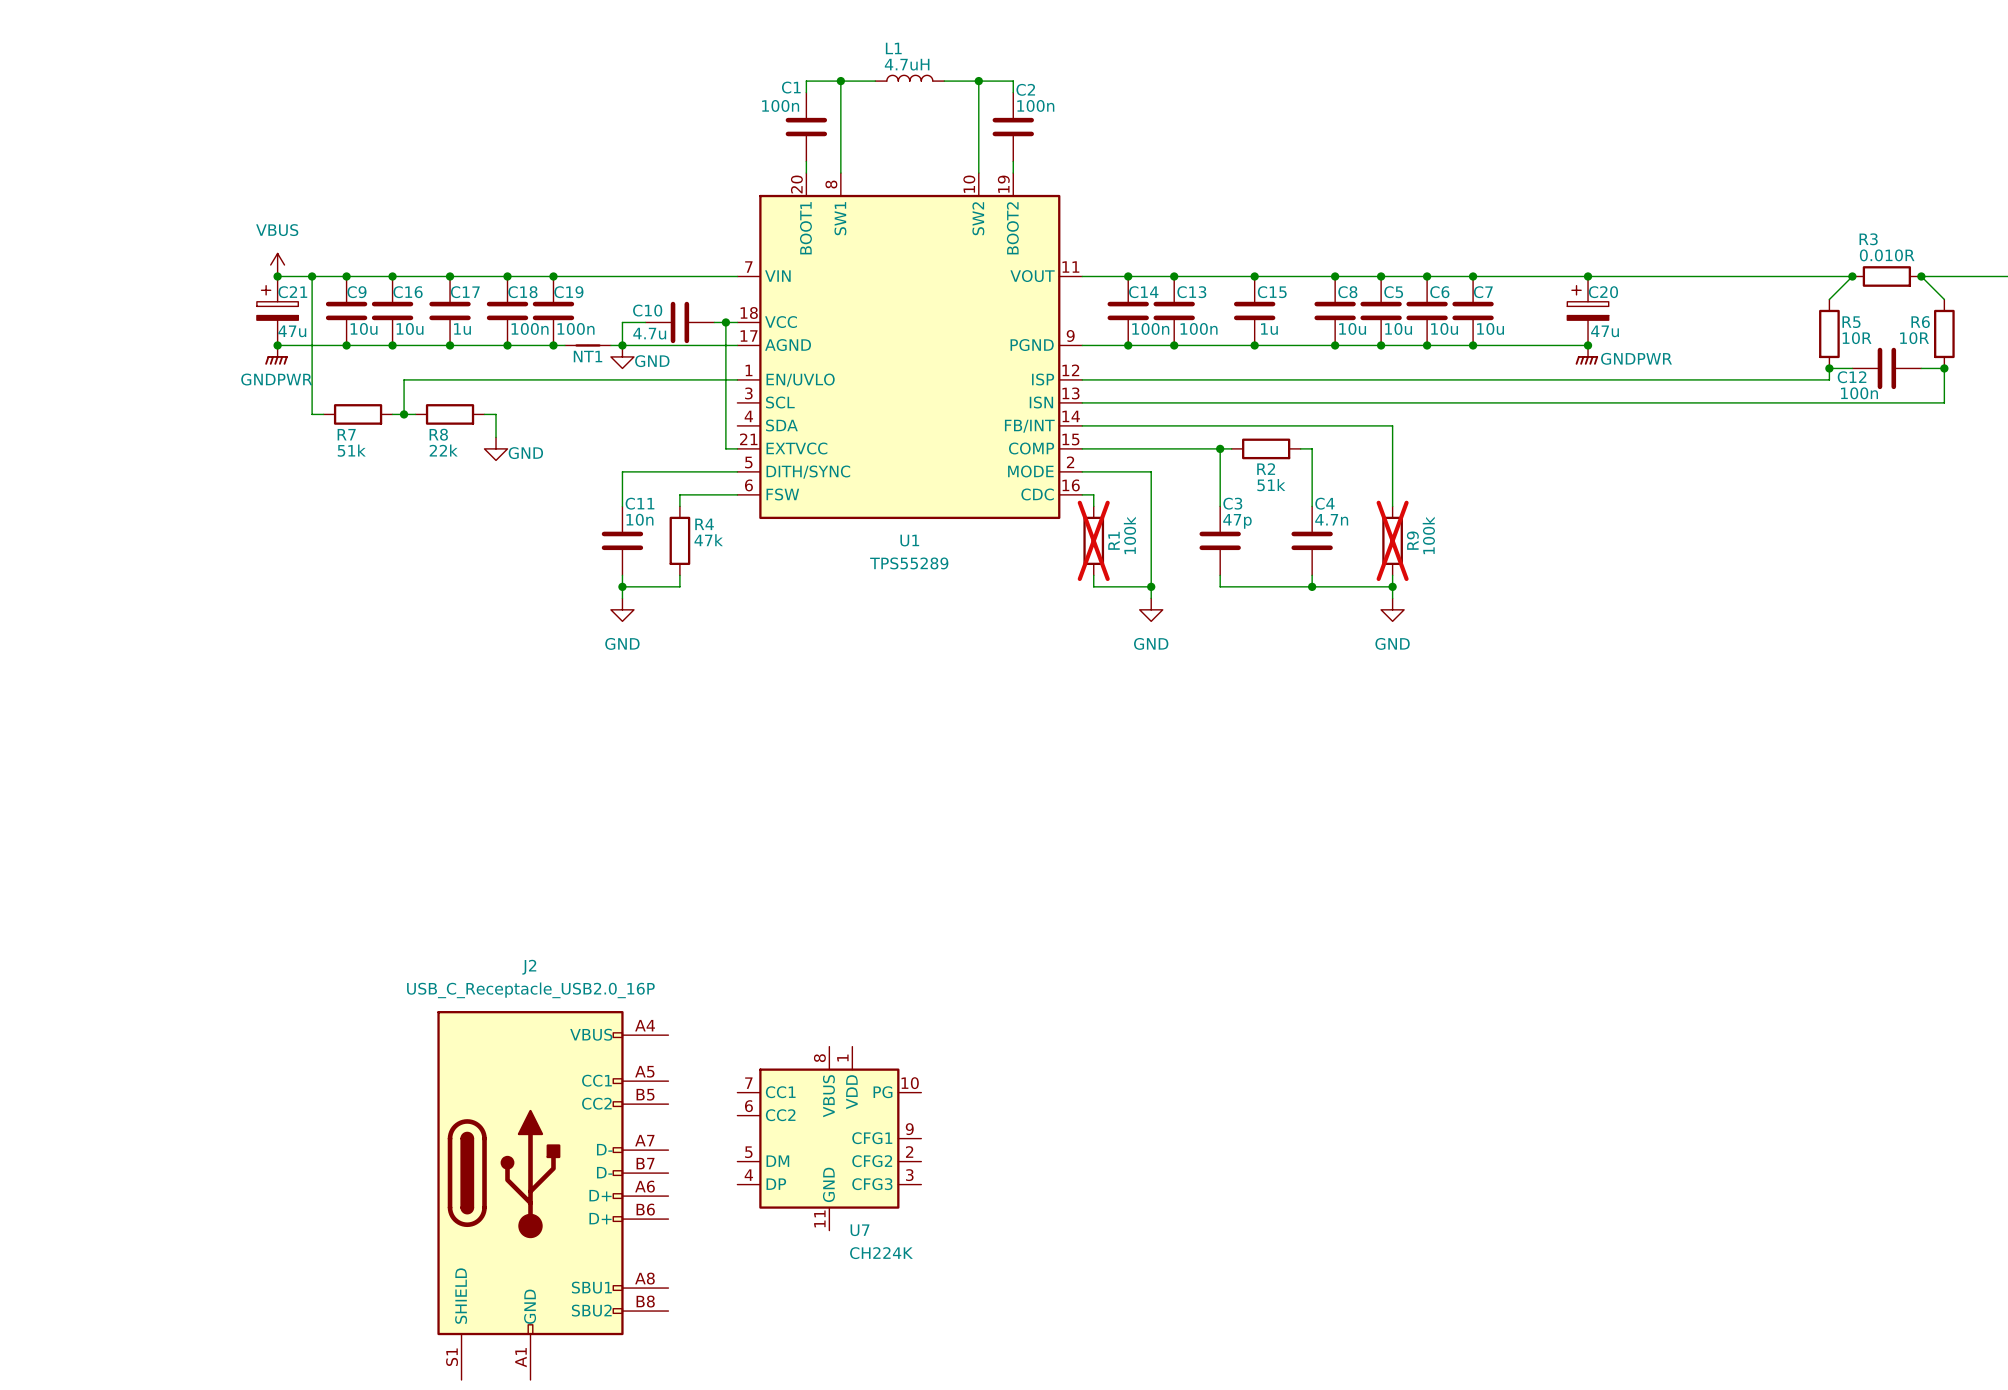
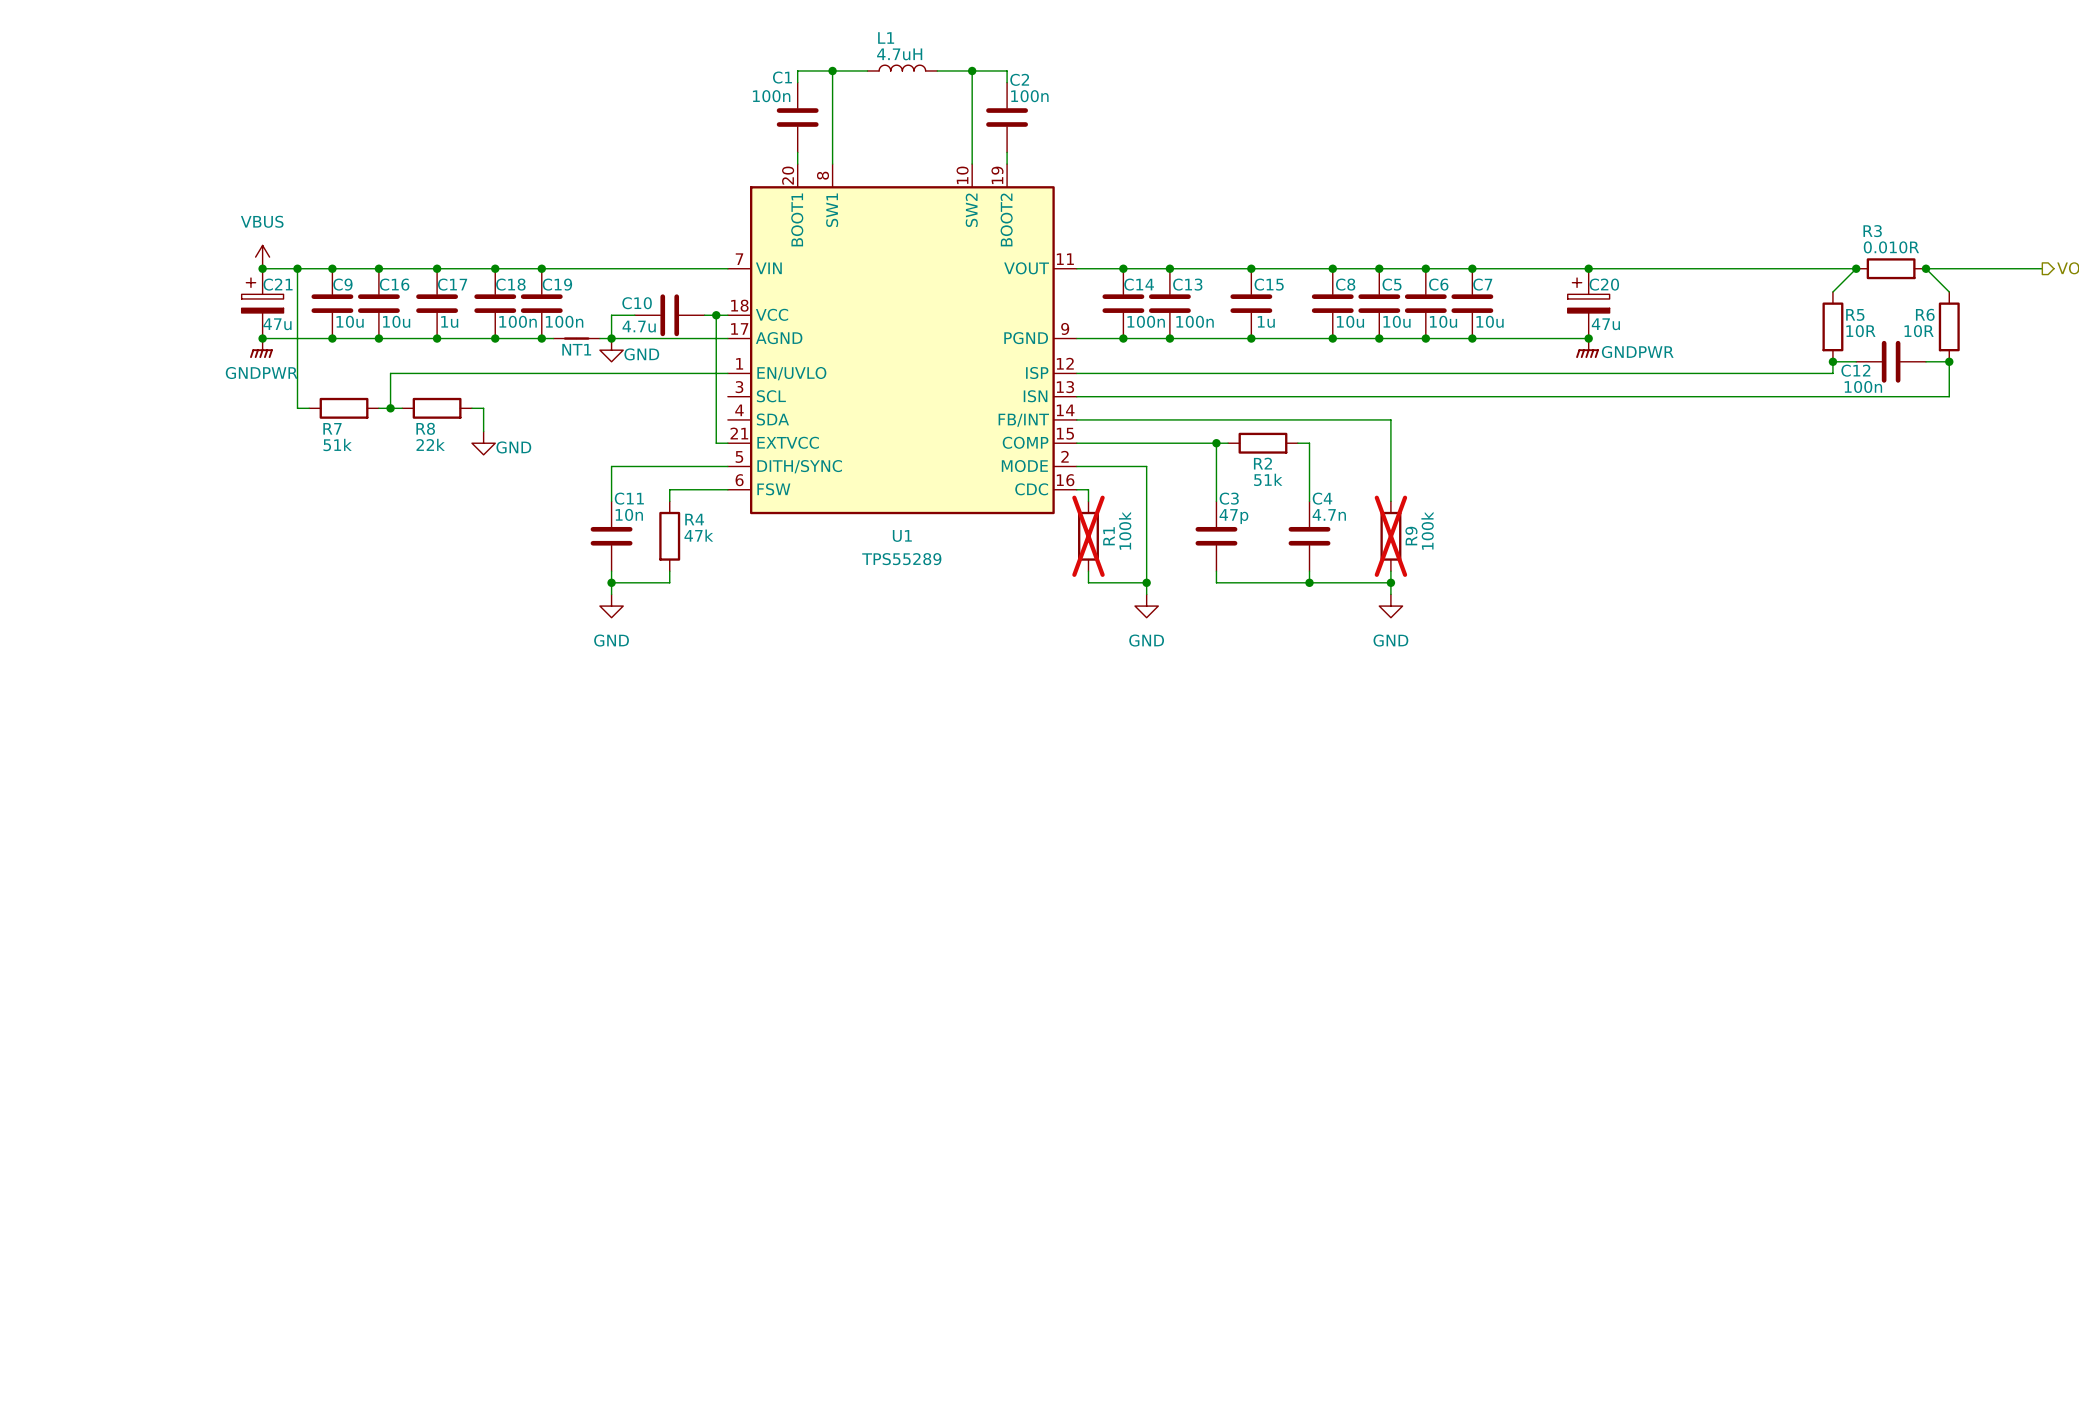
U7: CH224K (829, 1138) -> none
J2: USB_C_Receptacle_USB2.0_16P (552, 1195) -> none

